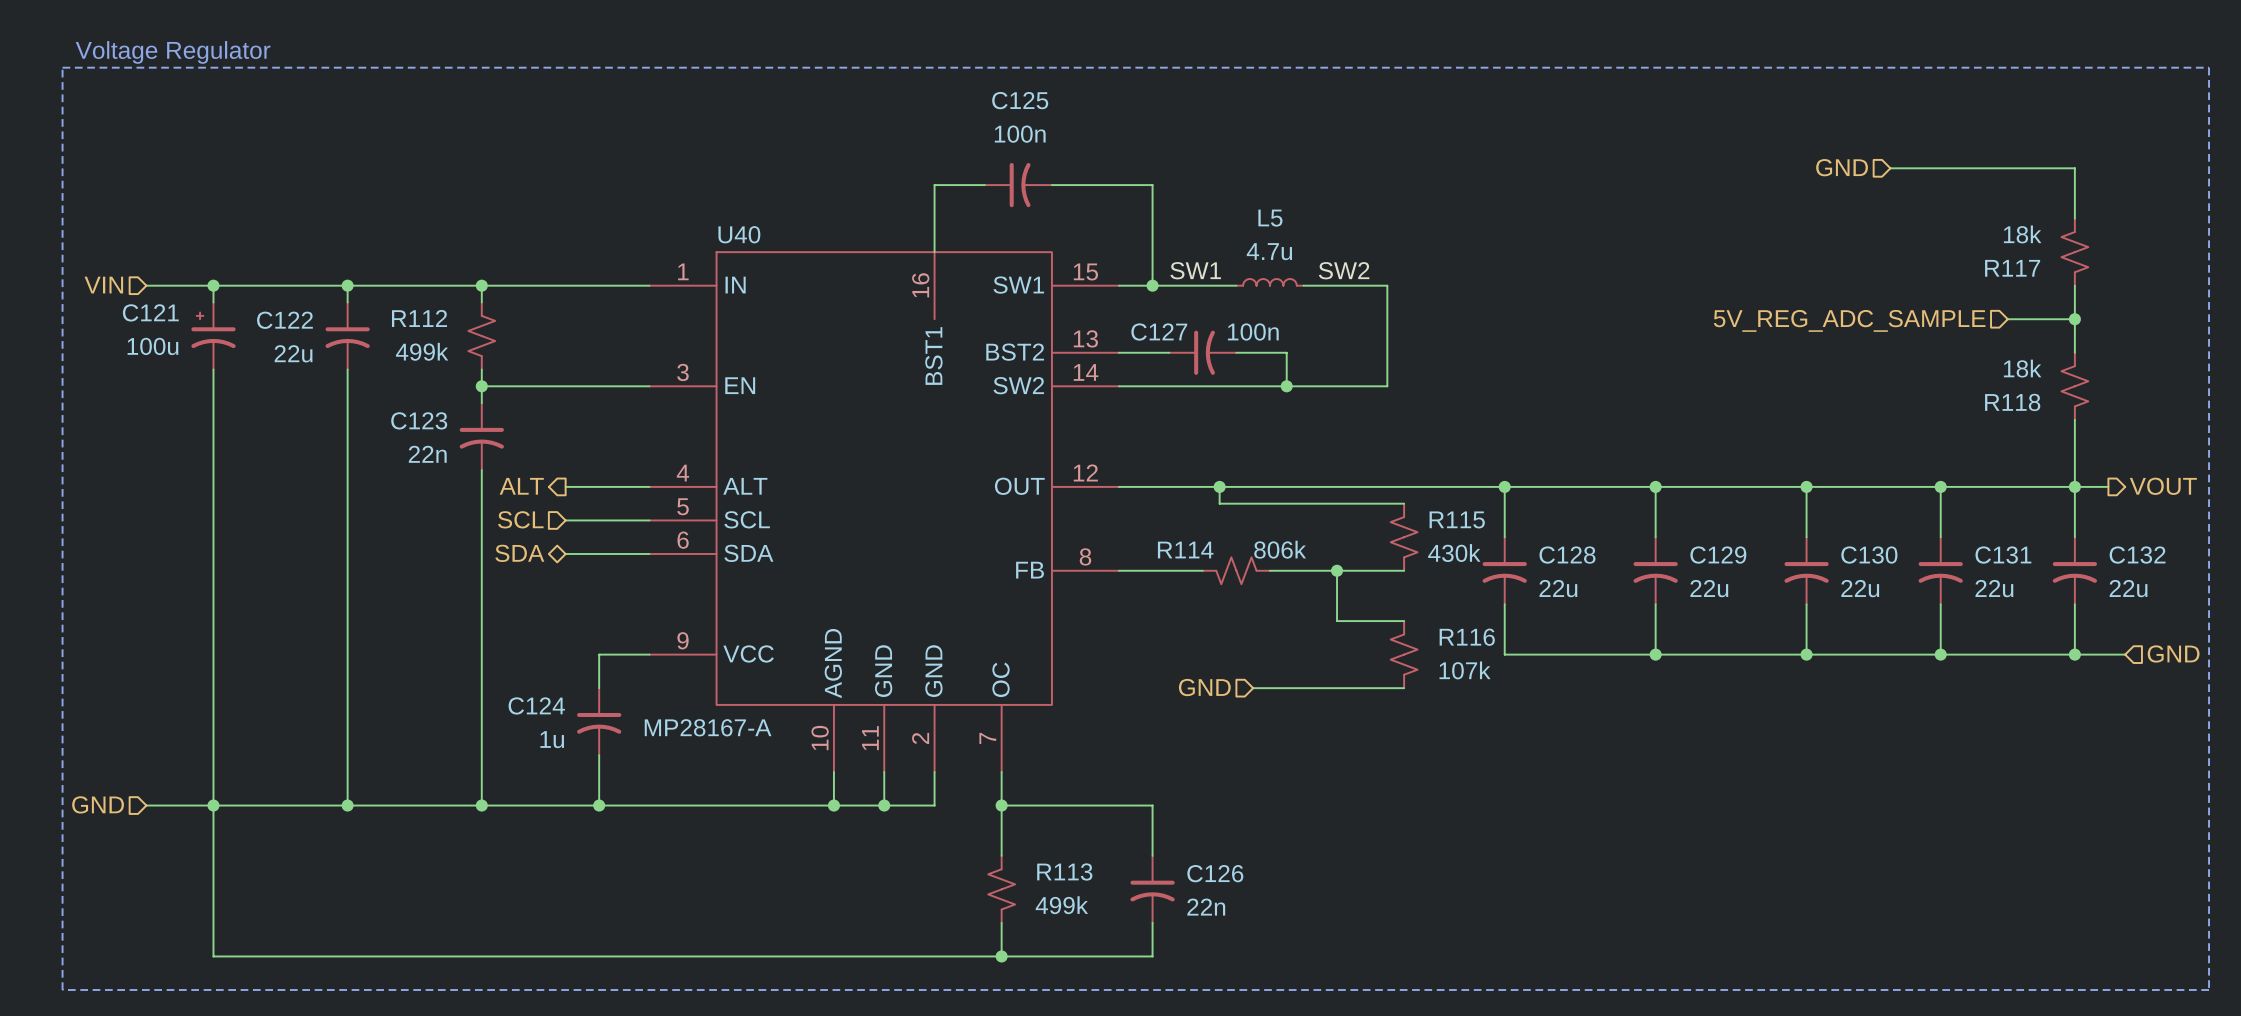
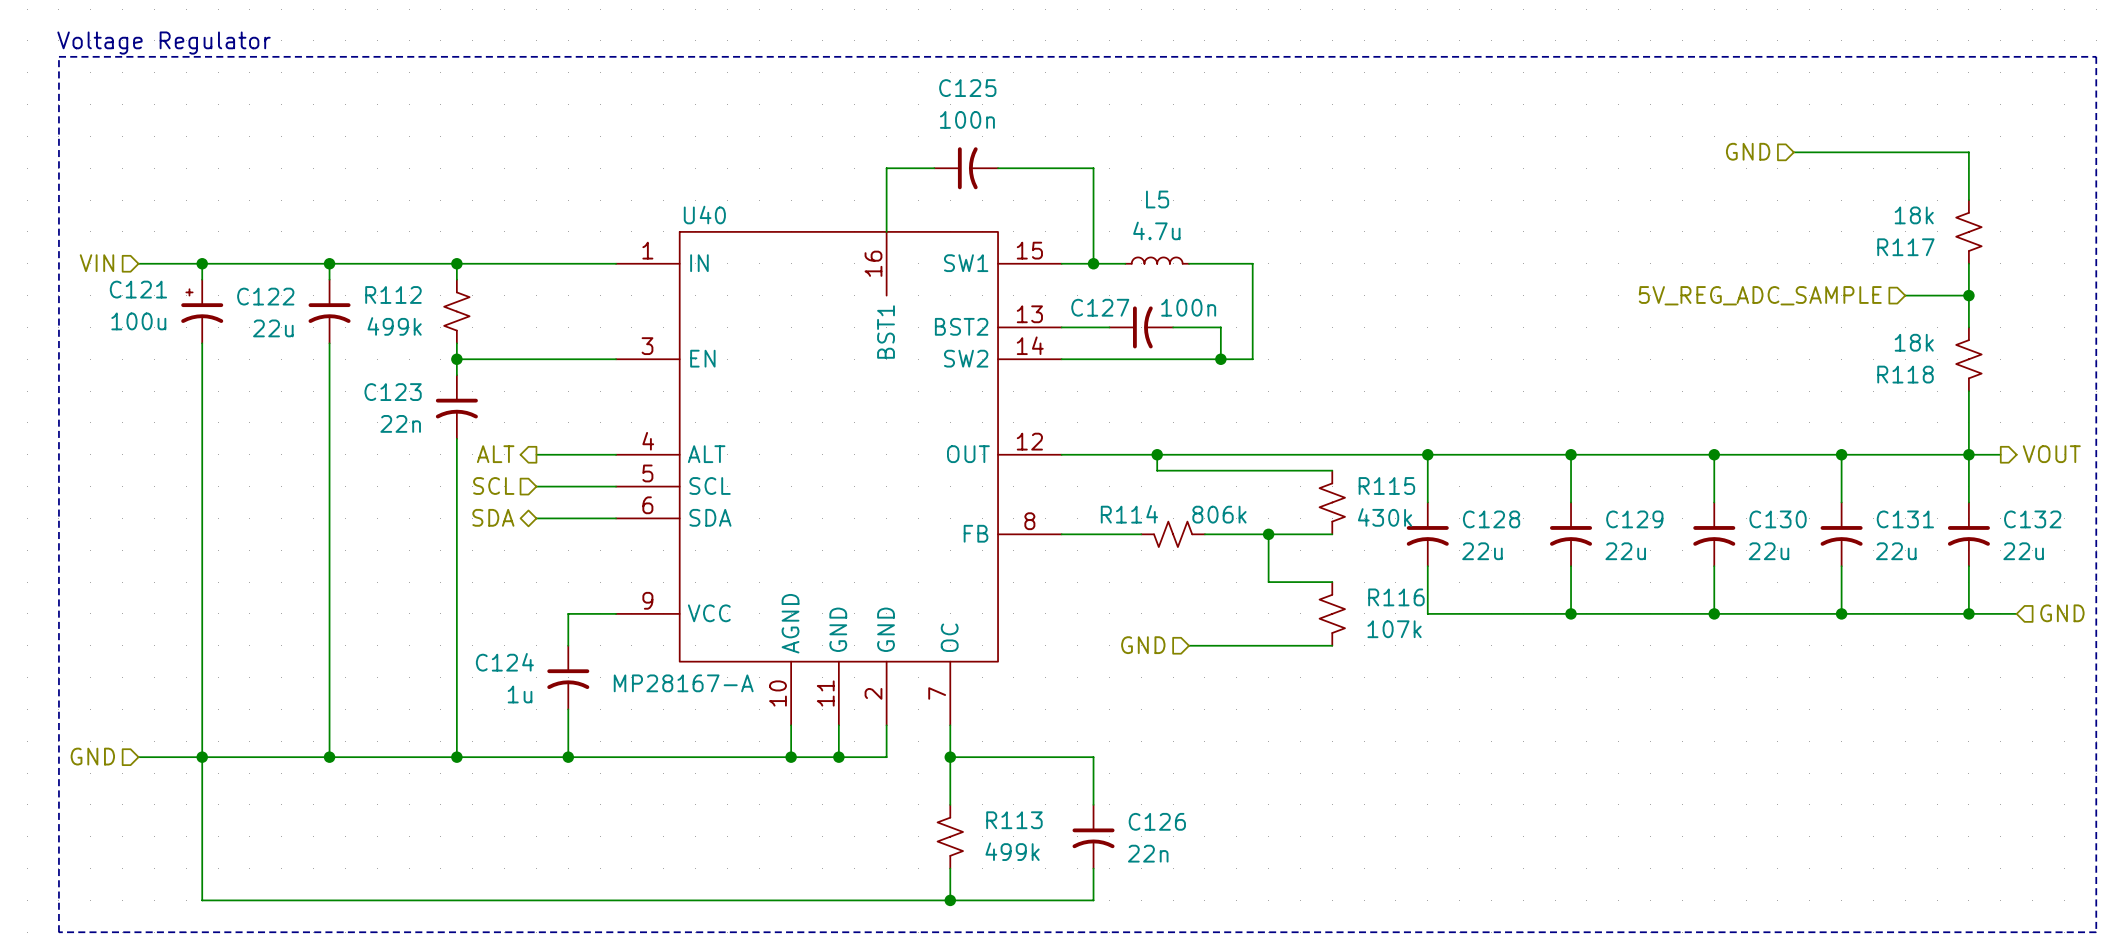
label: SW1 (1195, 270) -> none
label: SW2 (1344, 270) -> none
L5 position: (1269, 282) -> (1157, 260)
wire: (1186, 285) (1236, 285) -> (1189, 263) (1236, 263)
wire: (1320, 285) (1387, 285) (1387, 386) (1320, 386) -> (1252, 263) (1252, 359)

